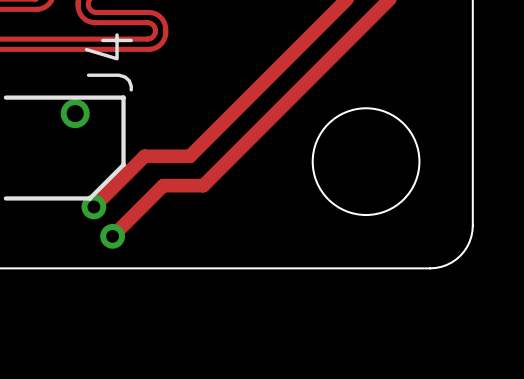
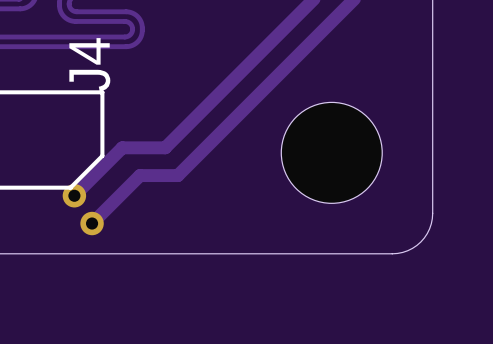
via: (75, 113) -> none

